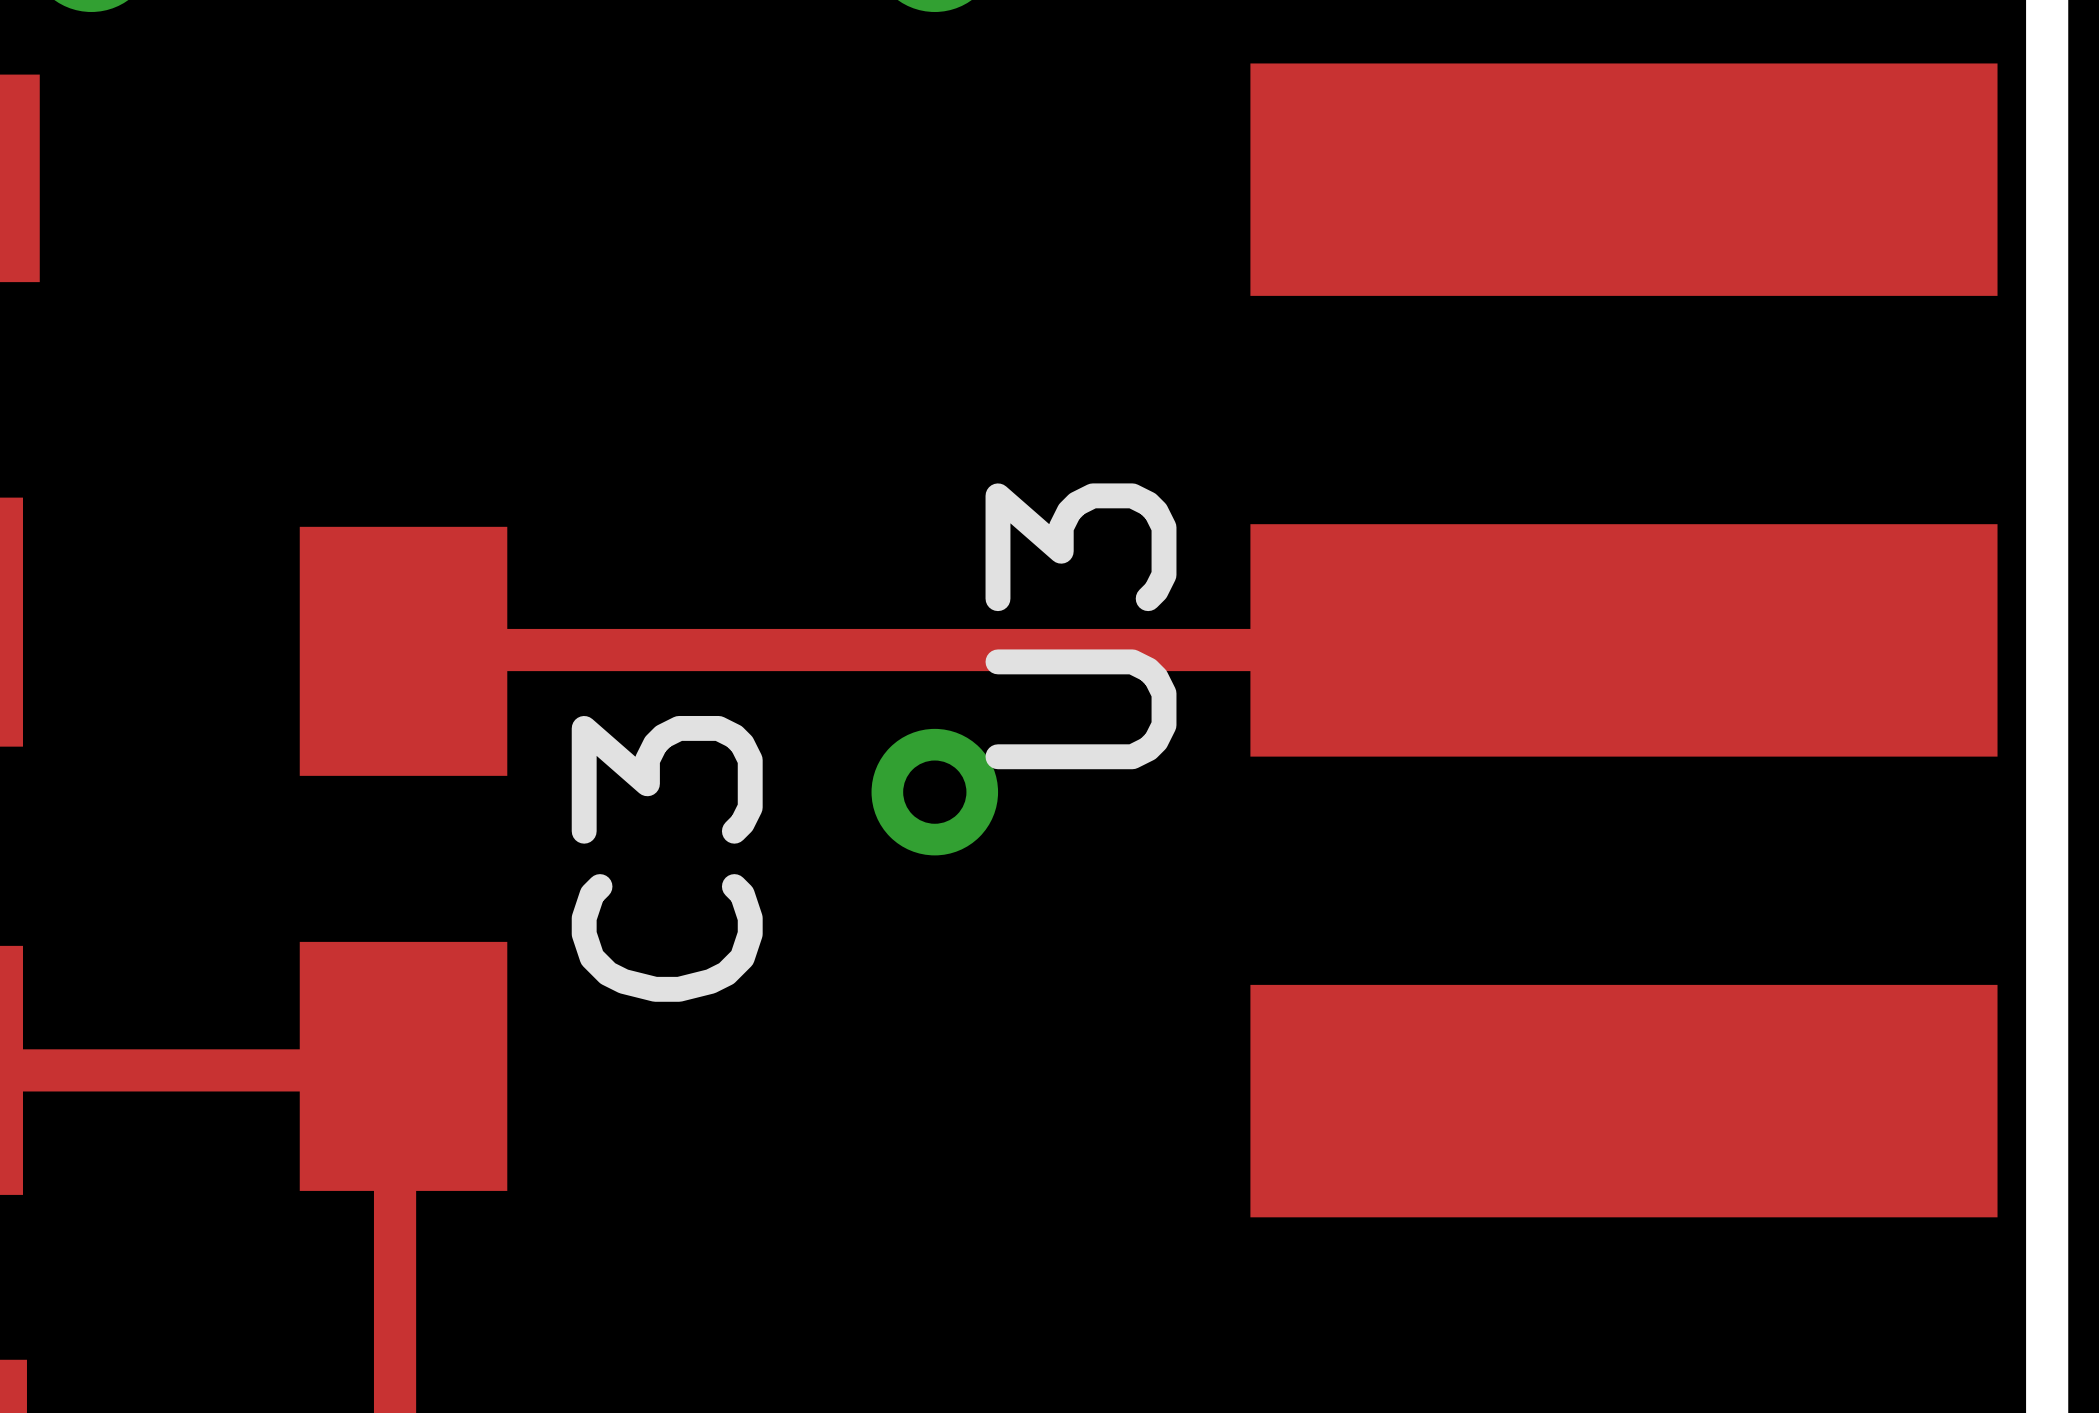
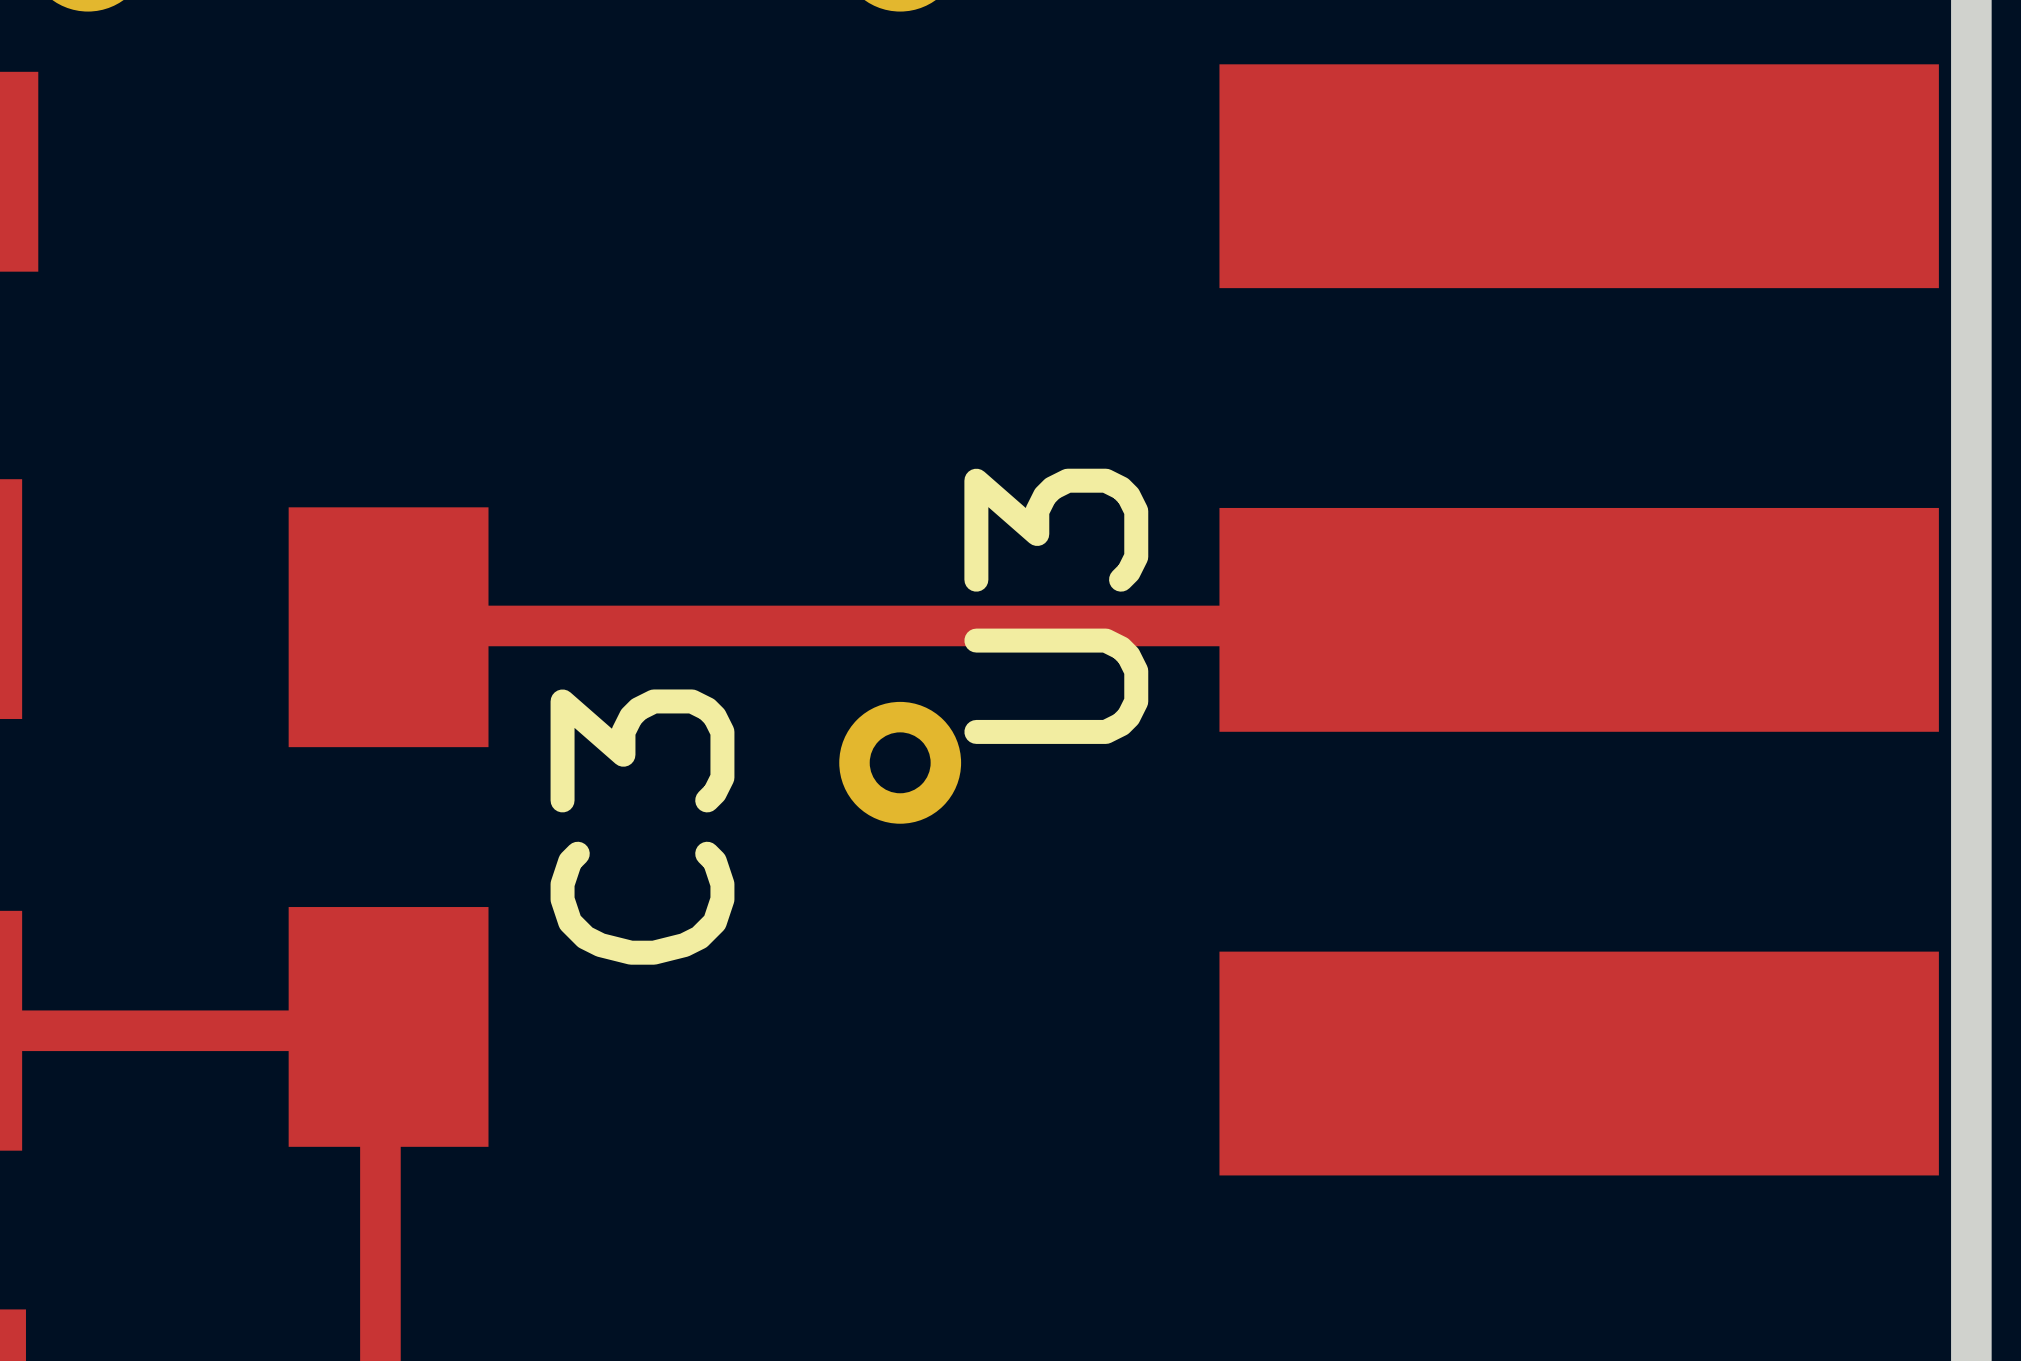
U3 position: (1623, 640) -> (1579, 619)

